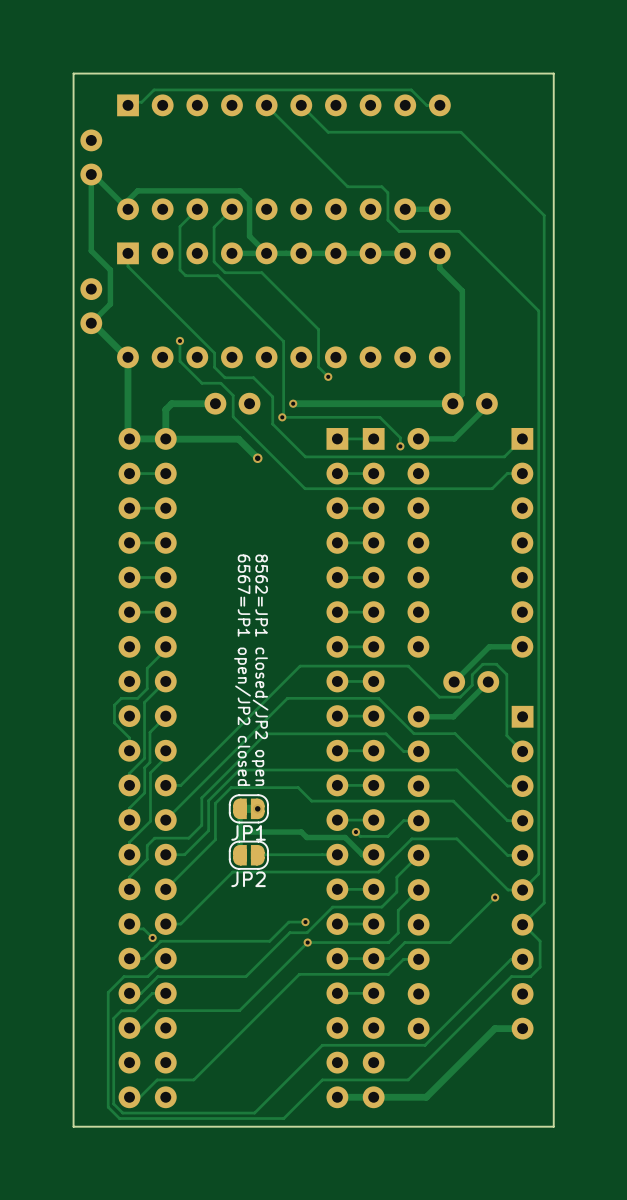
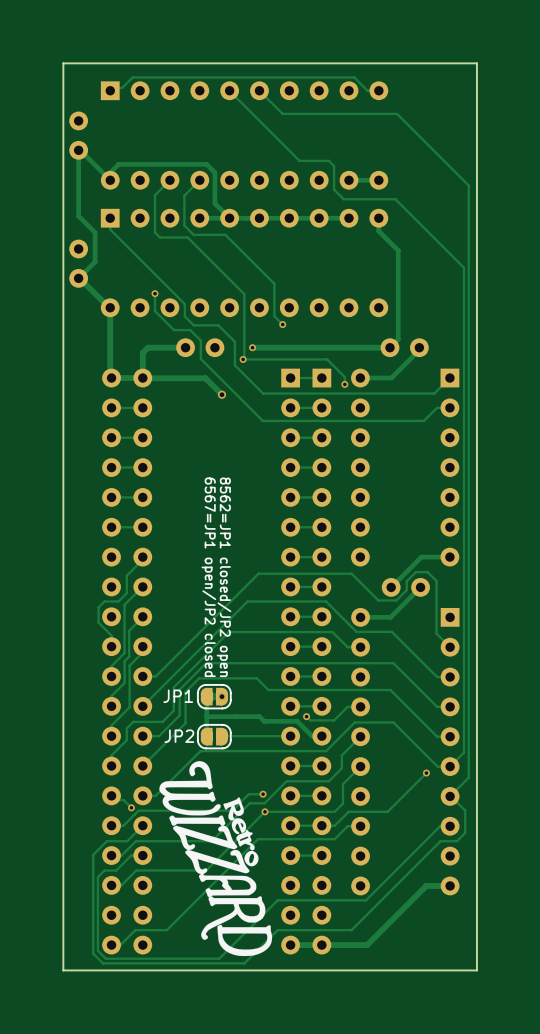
JP1 name position: JP1 (248, 832) -> JP1 (178, 696)
JP2 name position: JP2 (248, 879) -> JP2 (179, 736)
drawing: none -> [159, 761, 273, 957]

